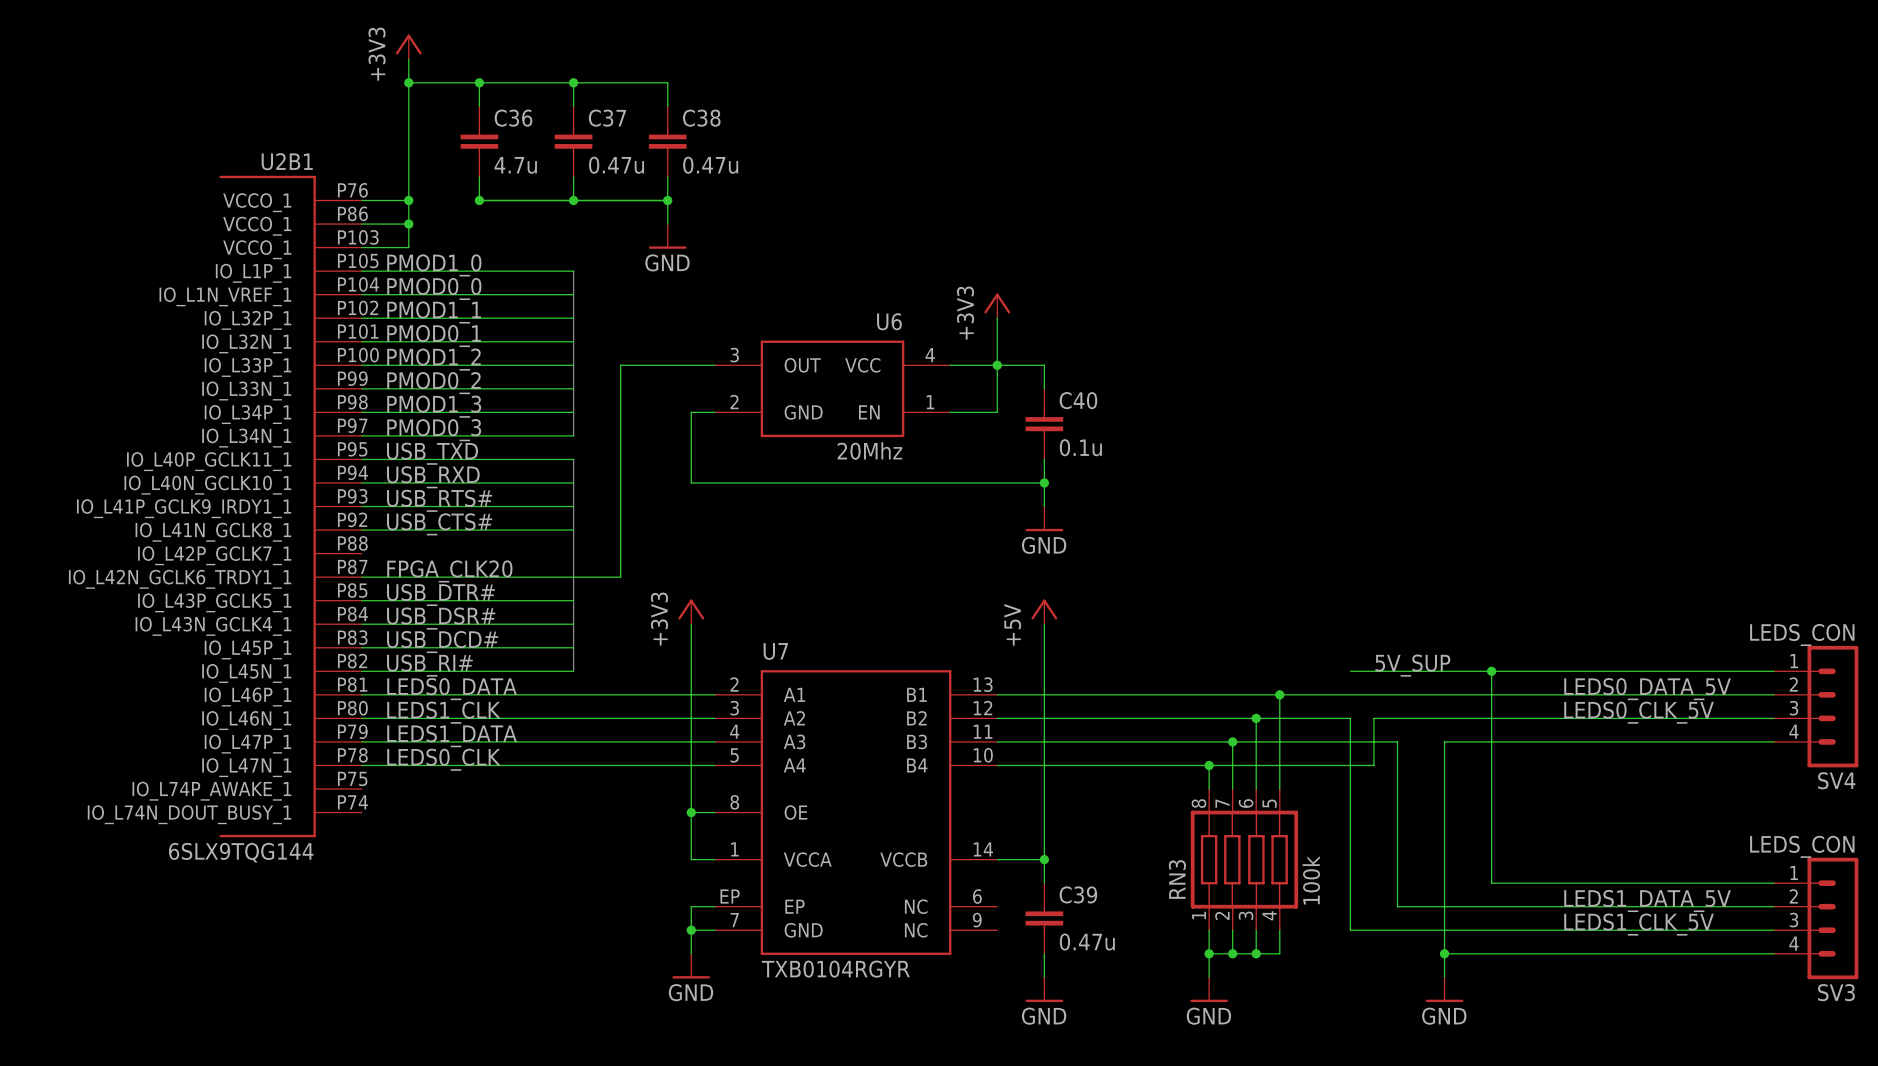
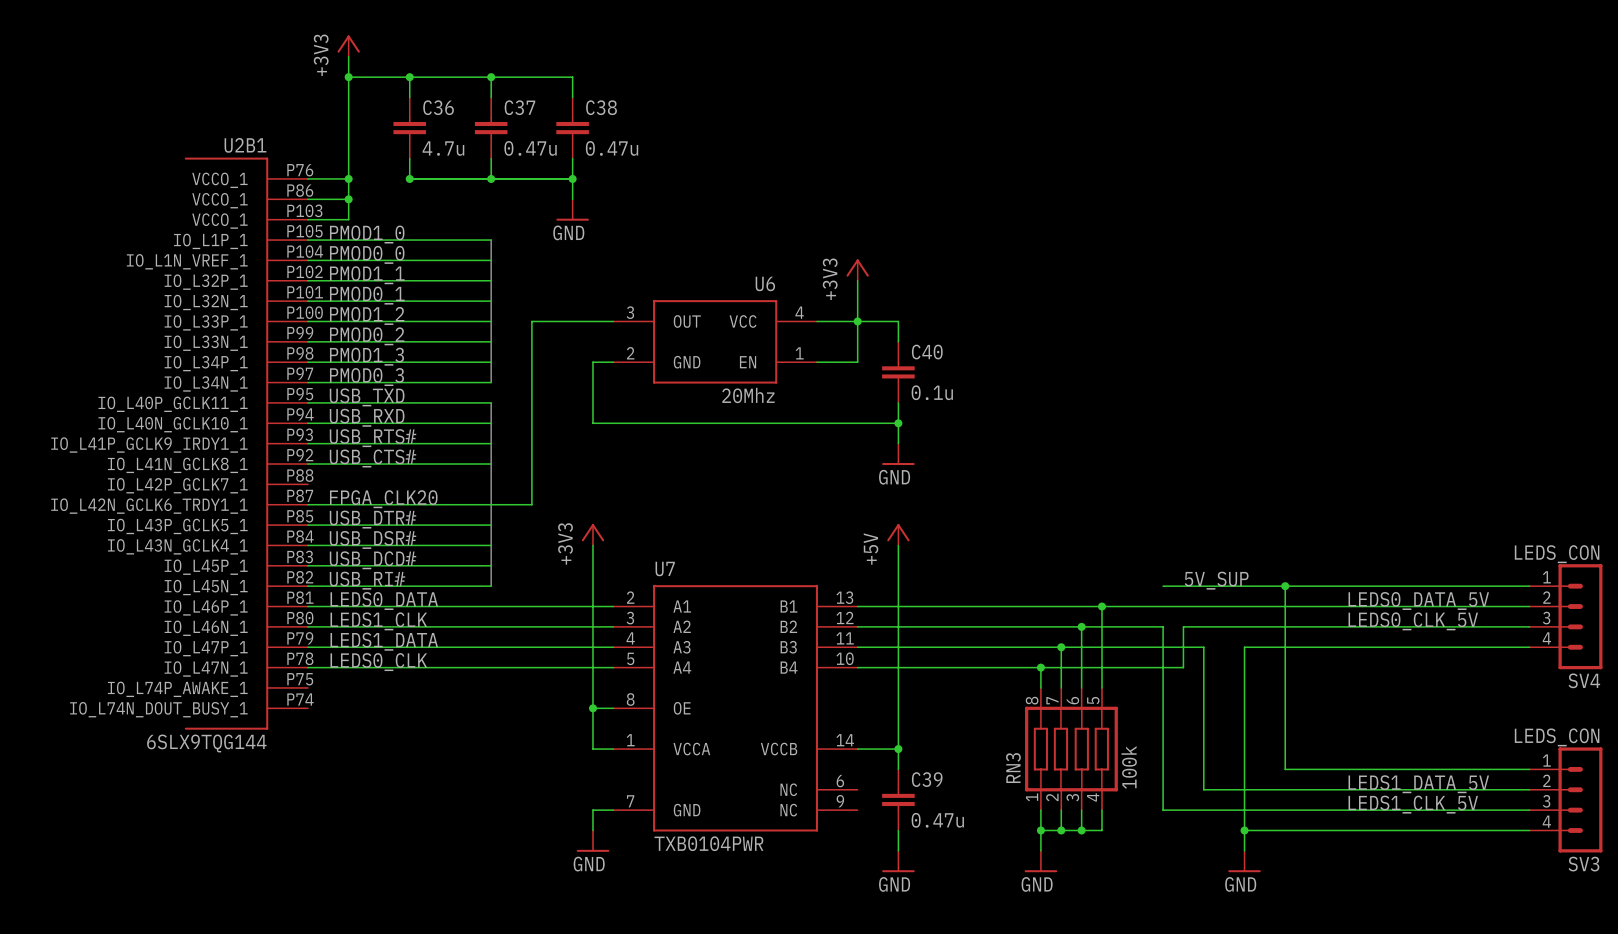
U7 symbol: [714, 670, 998, 955] -> [613, 585, 858, 832]
wire: (714, 906) (691, 906) (691, 930) -> none
junction: (691, 930) -> none
U7 value: TXB0104RGYR (835, 969) -> TXB0104PWR (708, 843)

